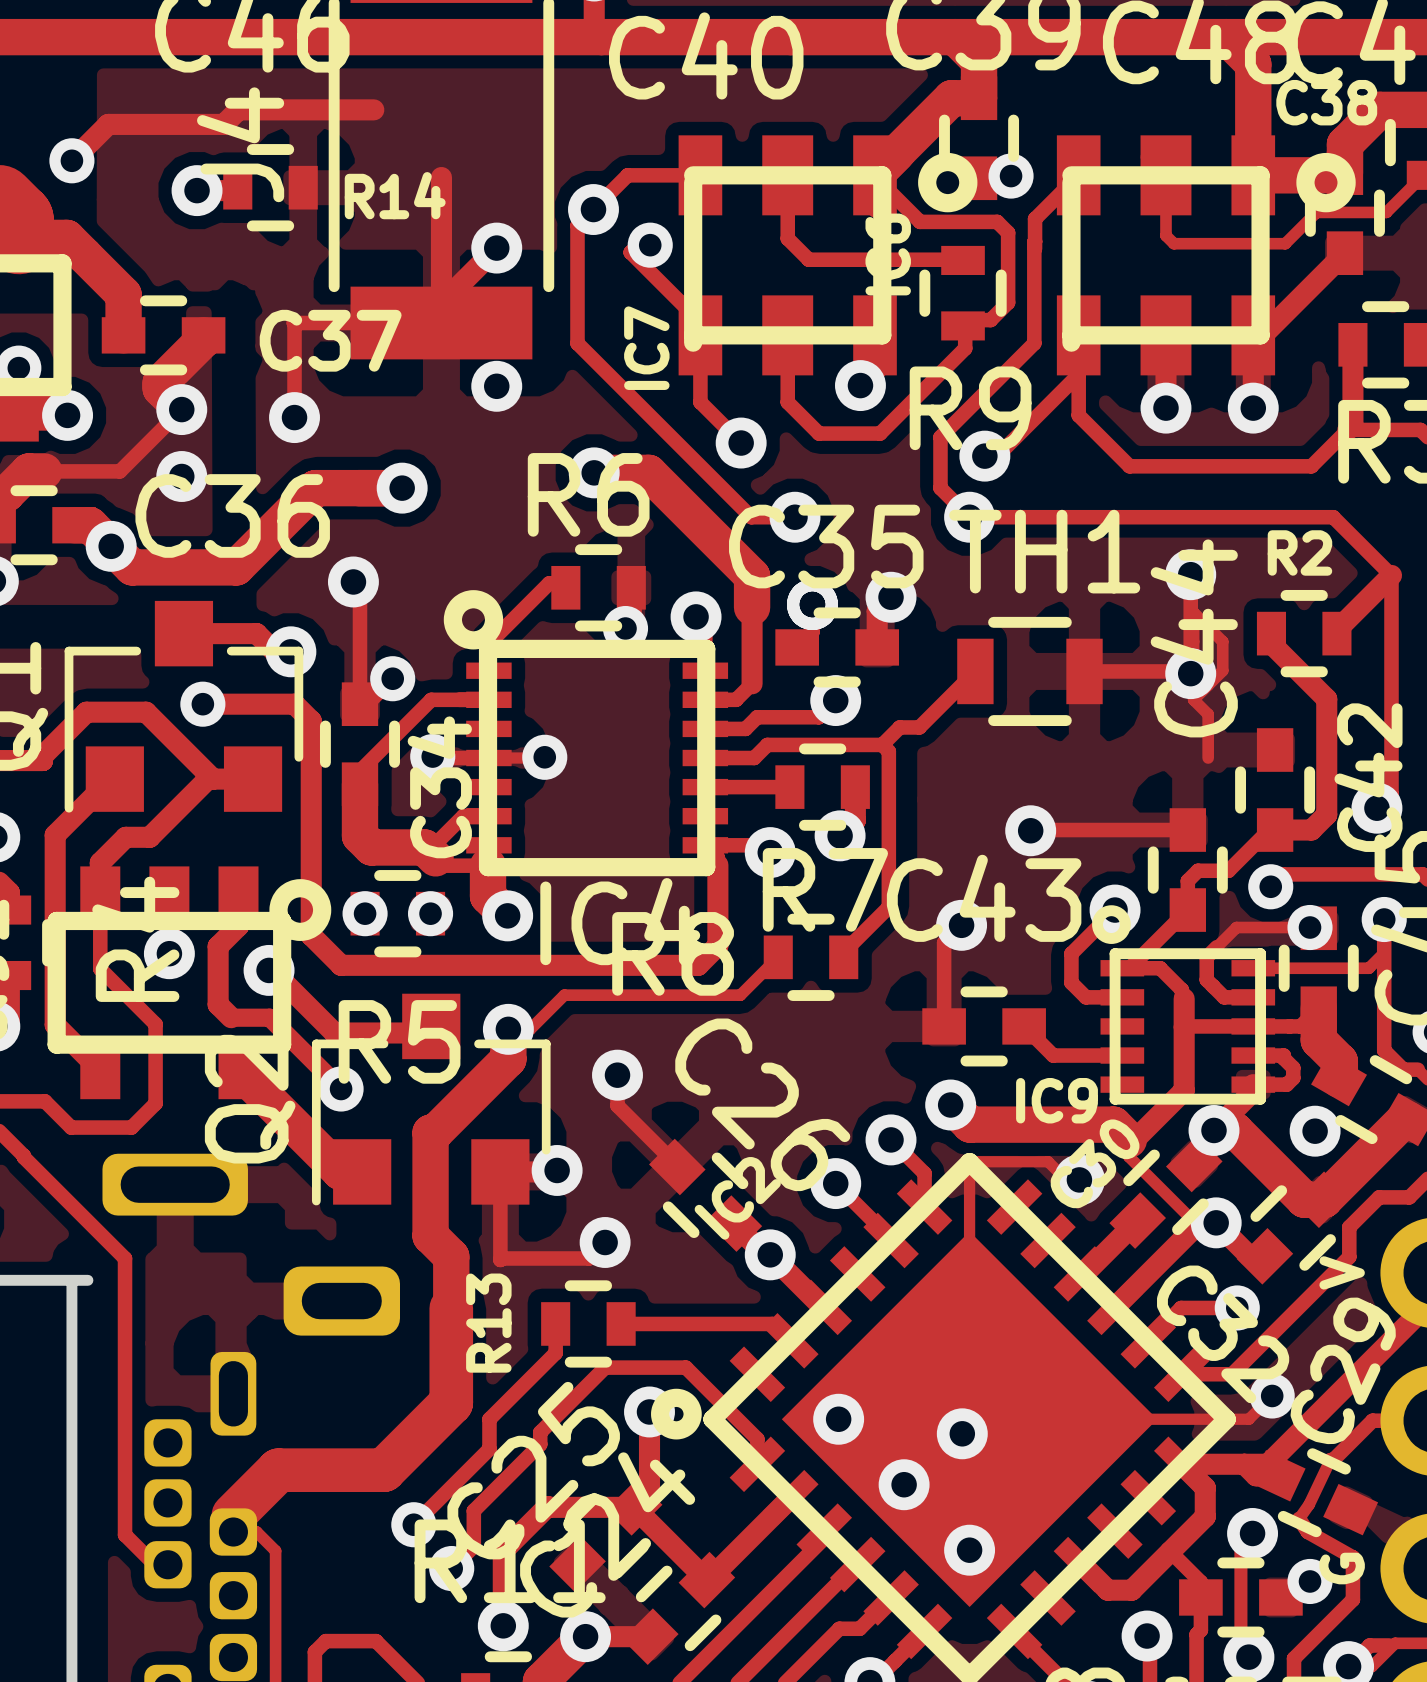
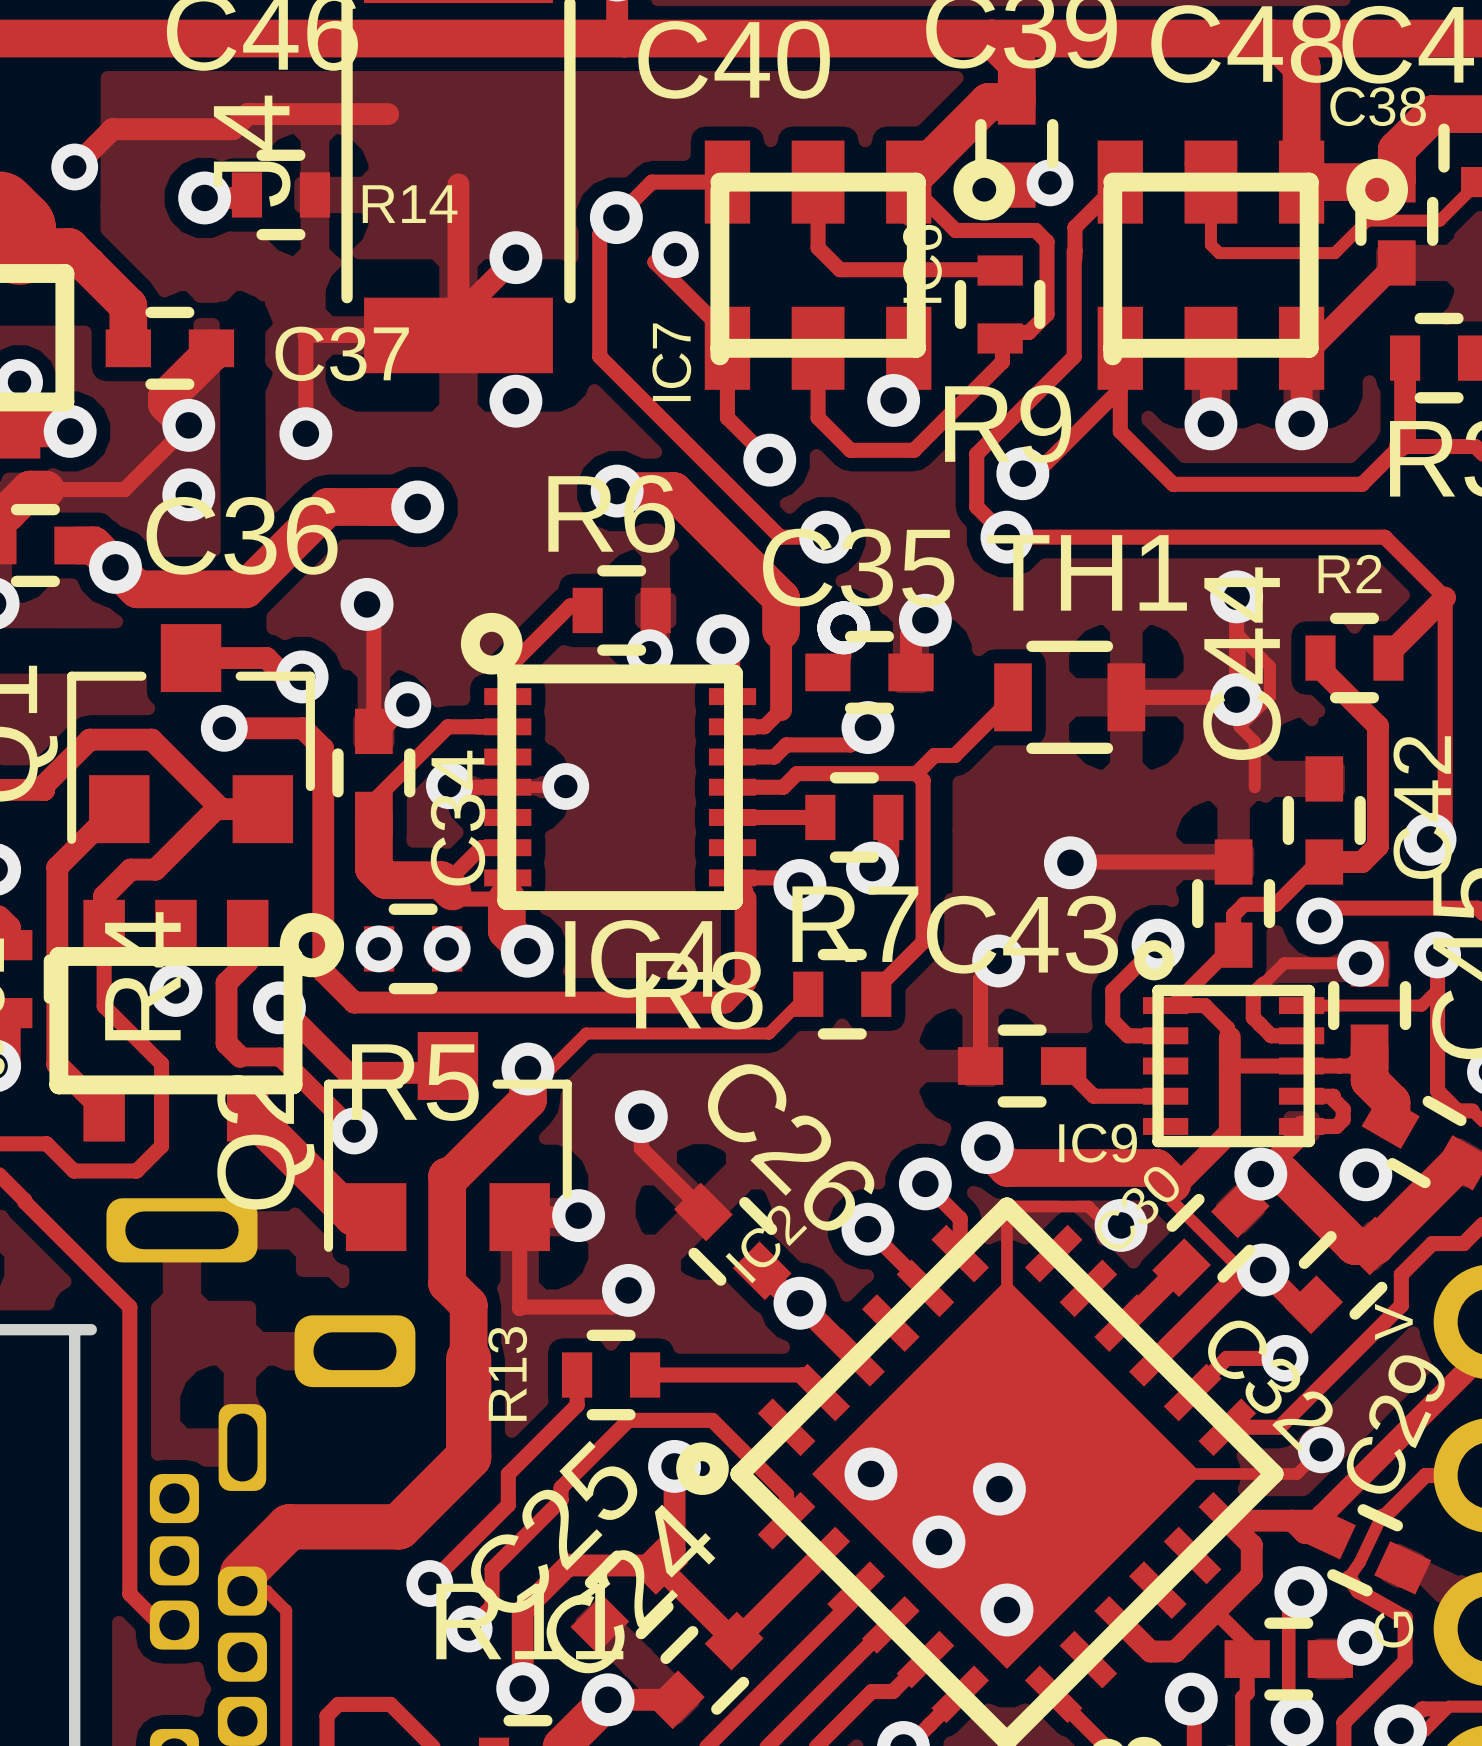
track: (202, 704) (294, 704) -> (224, 728) (302, 728) (305, 731)
via position: (202, 704) -> (224, 728)

